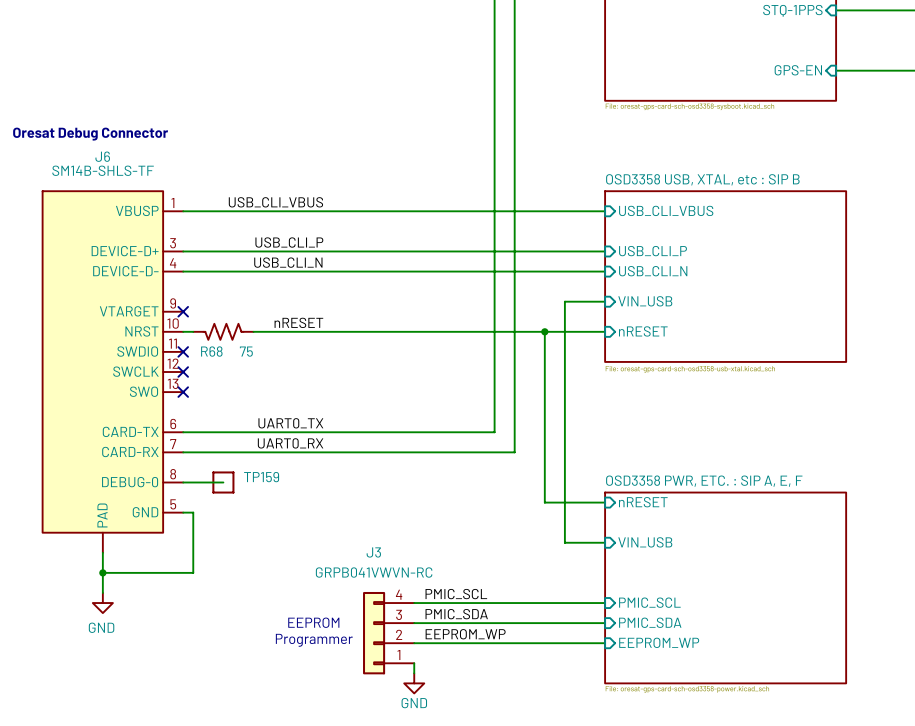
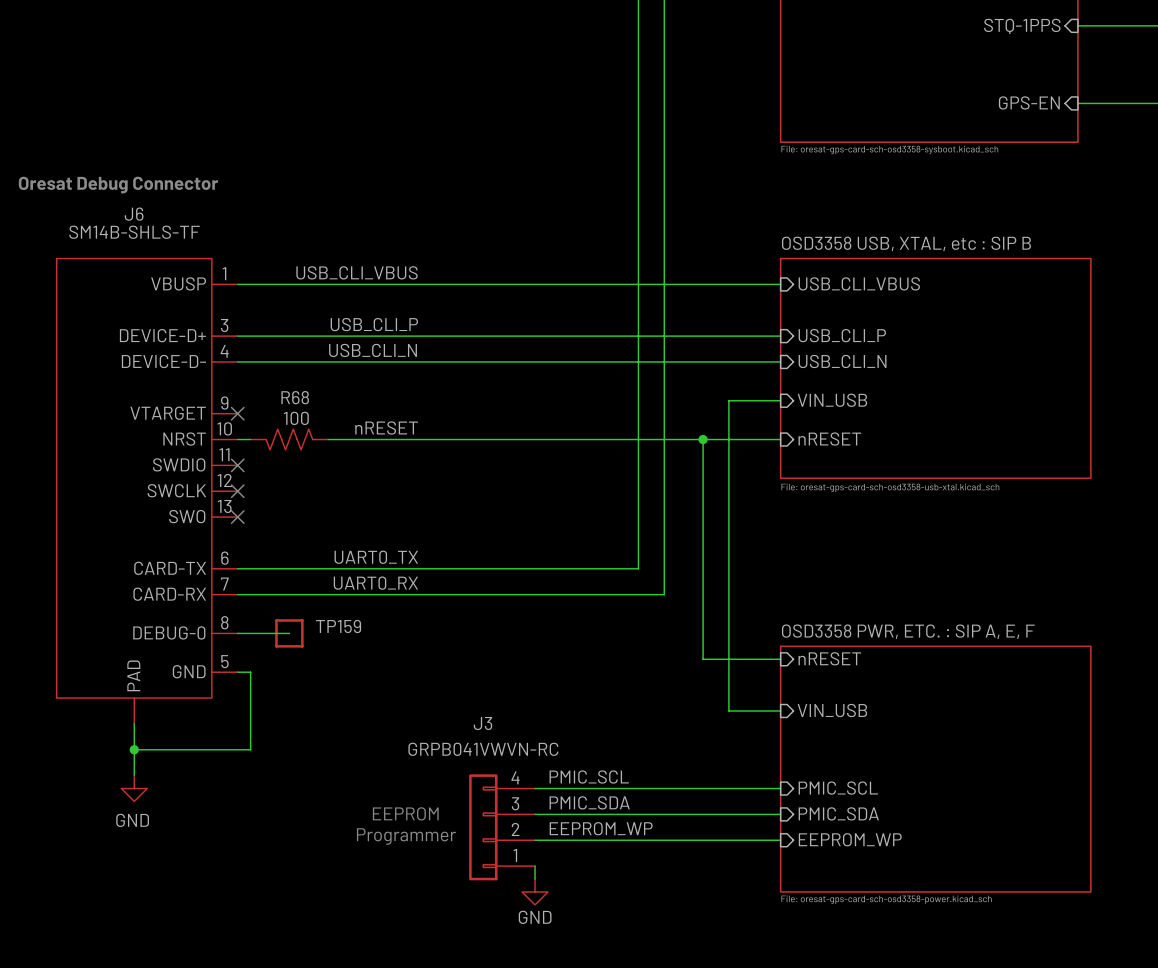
R68 name position: R68 (211, 351) -> R68 (295, 397)
R68 value: 75 (246, 351) -> 100 (296, 418)

